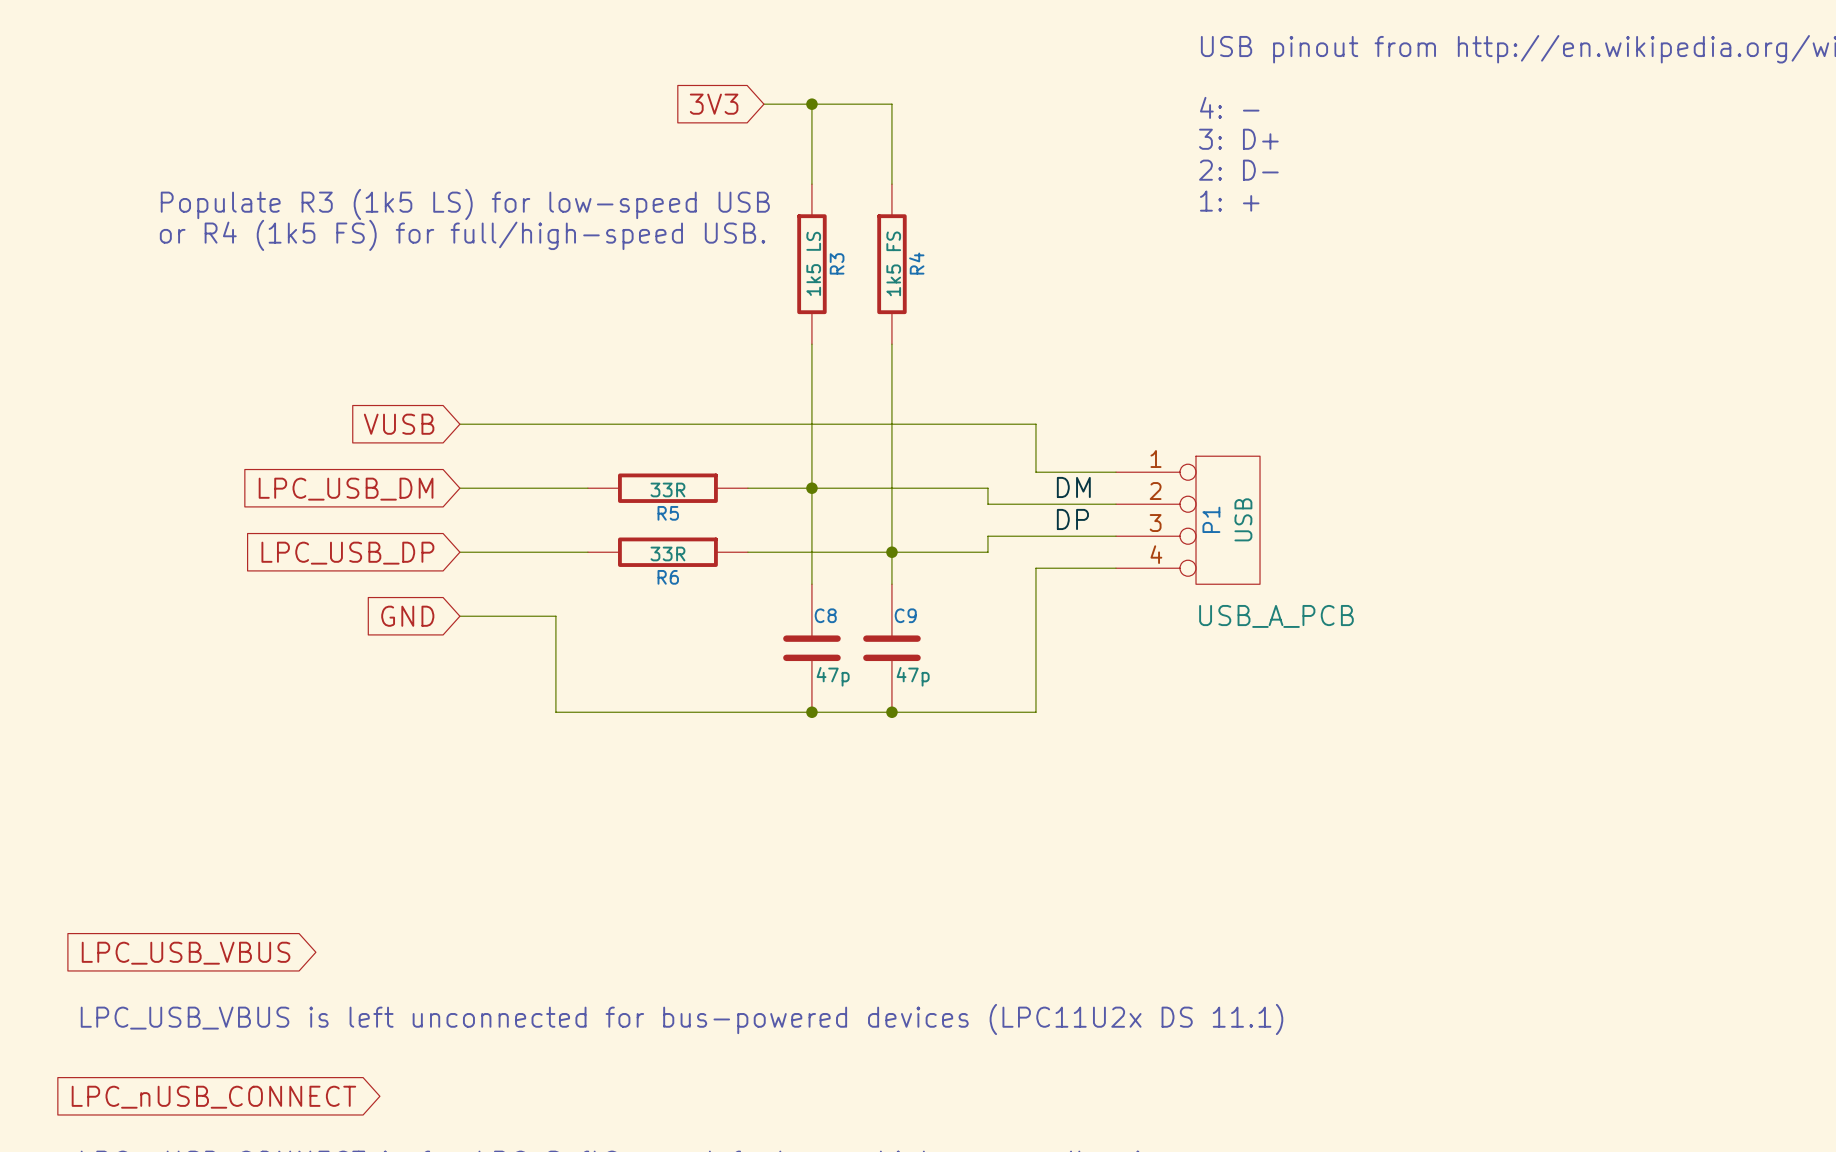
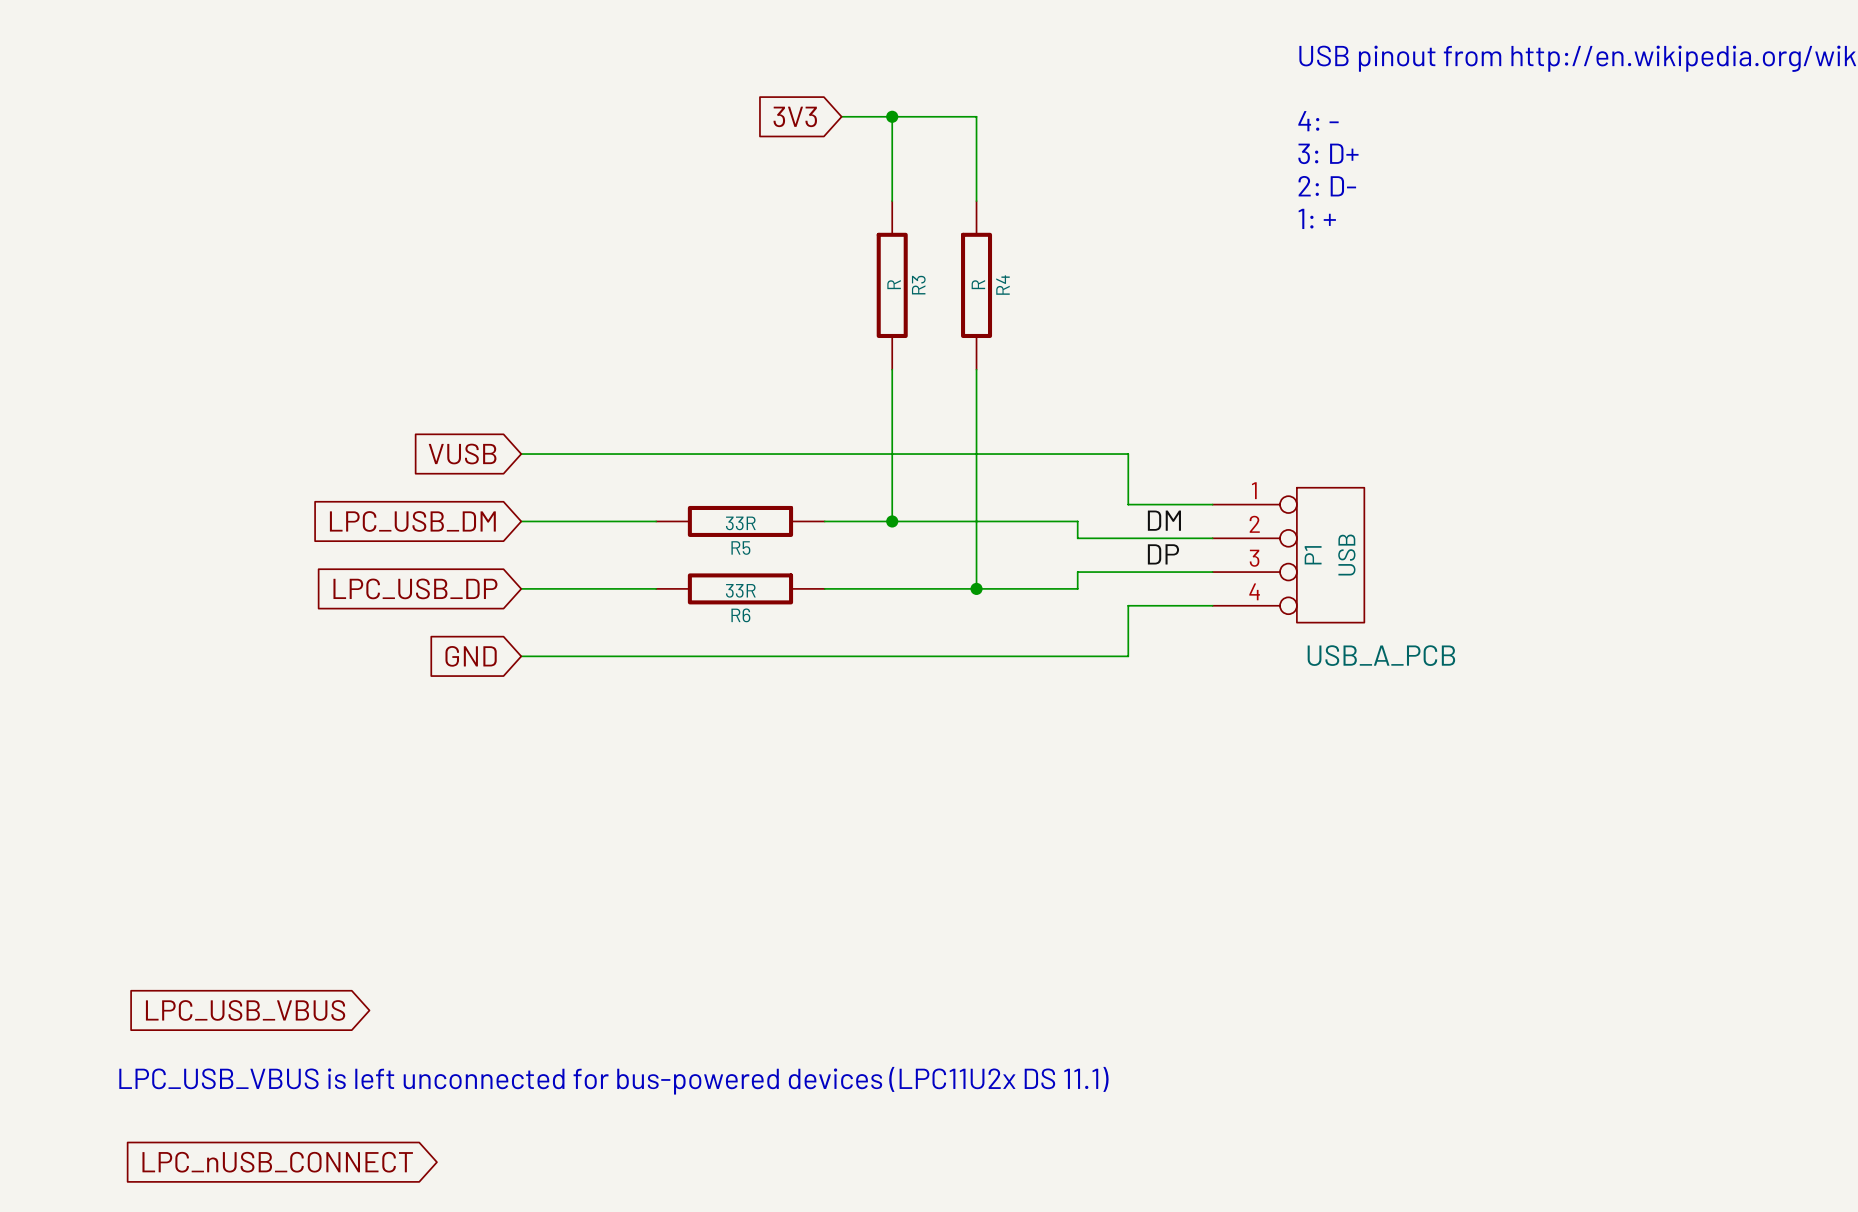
text: Populate R3 (1k5 LS) for low-speed USB (465, 204) -> none
text: or R4 (1k5 FS) for full/high-speed USB. (462, 235) -> none
R3 value: 1k5 LS (813, 263) -> R (894, 284)
R4 value: 1k5 FS (893, 263) -> R (978, 284)
wire: (811, 488) (811, 584) -> none
wire: (891, 552) (891, 584) -> none
wire: (555, 616) (555, 712) (1035, 712) (1035, 616) -> (622, 656) (1128, 656)
C8: 47p (811, 648) -> none
C9: 47p (891, 648) -> none
junction: (811, 712) -> none
junction: (891, 712) -> none

